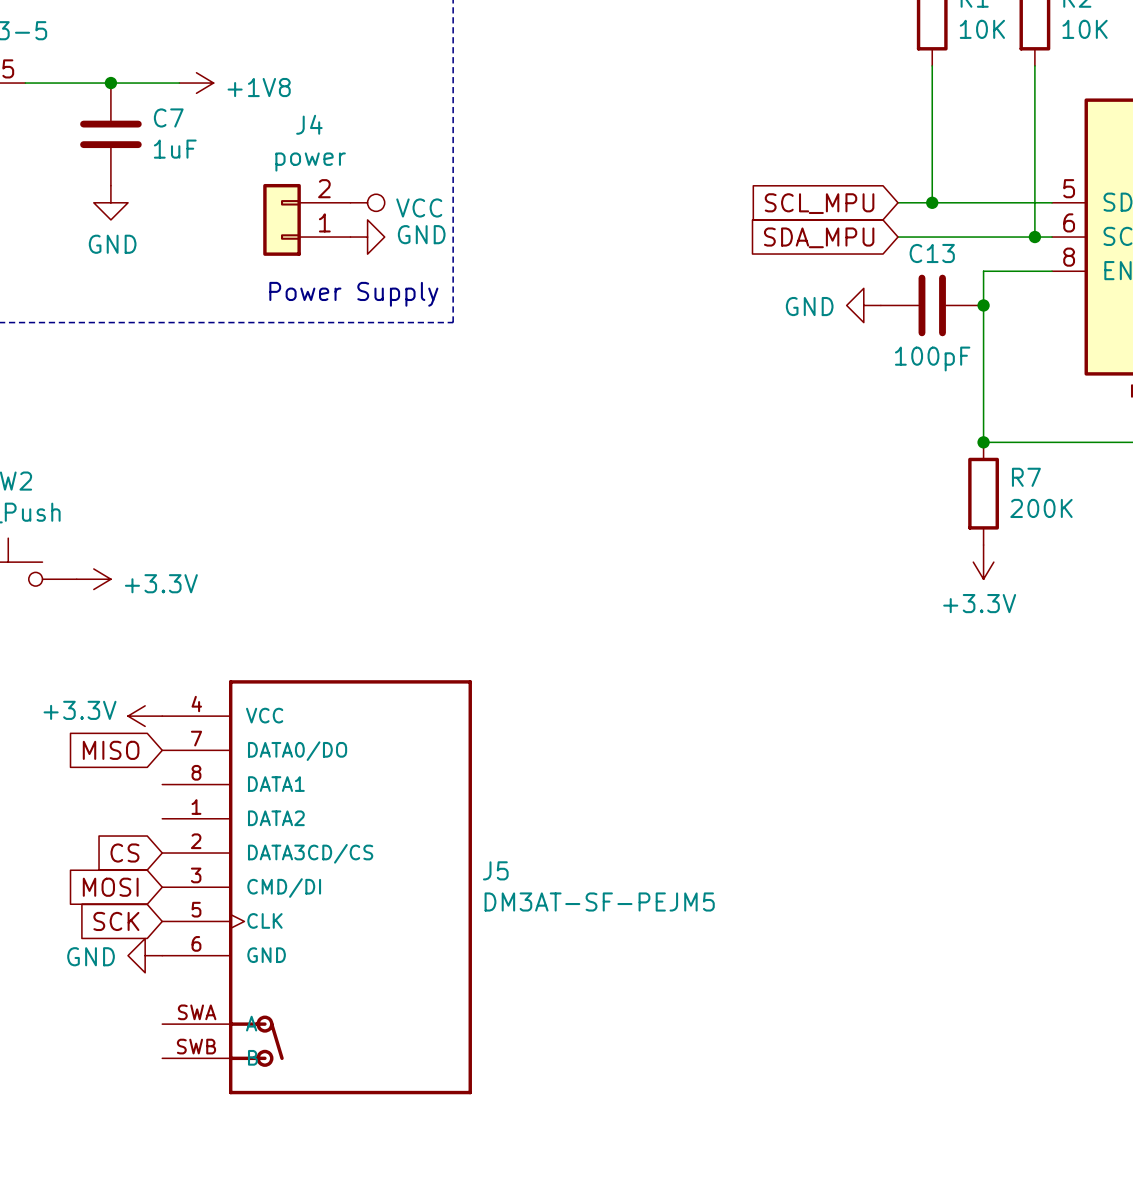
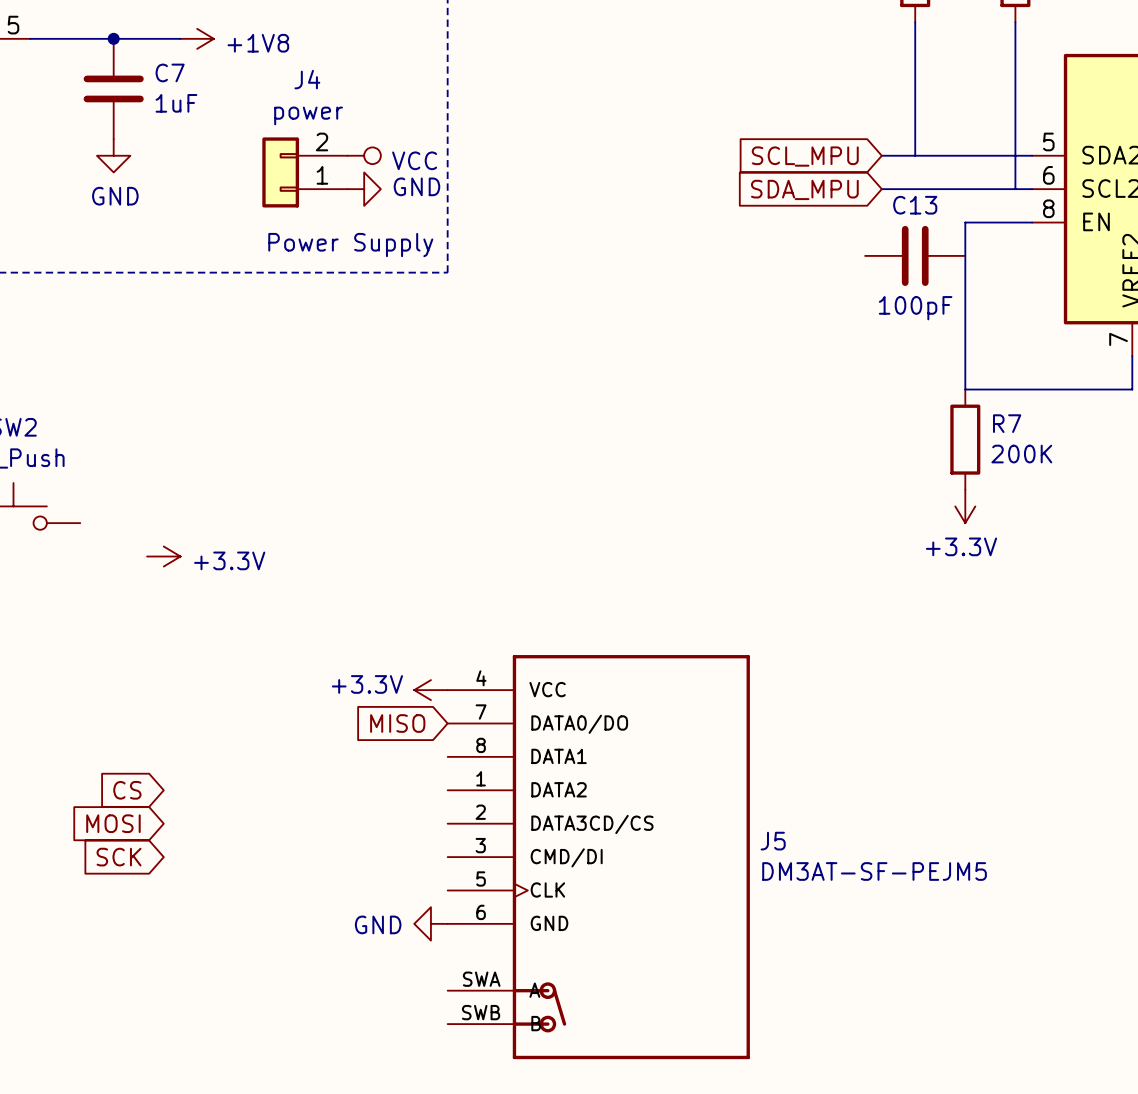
junction: (932, 202) -> none
junction: (1034, 237) -> none
power symbol: GND (863, 305) -> none
junction: (983, 305) -> none
junction: (983, 442) -> none
power symbol: +3.3V (93, 579) -> none
power symbol: none -> +3.3V (163, 556)
power symbol: +3.3V (145, 716) -> none
global label position: MISO (111, 750) -> MISO (397, 723)
power symbol: none -> +3.3V (430, 690)
J5 position: (317, 887) -> (598, 857)
power symbol: GND (145, 955) -> none
power symbol: none -> GND (430, 923)

